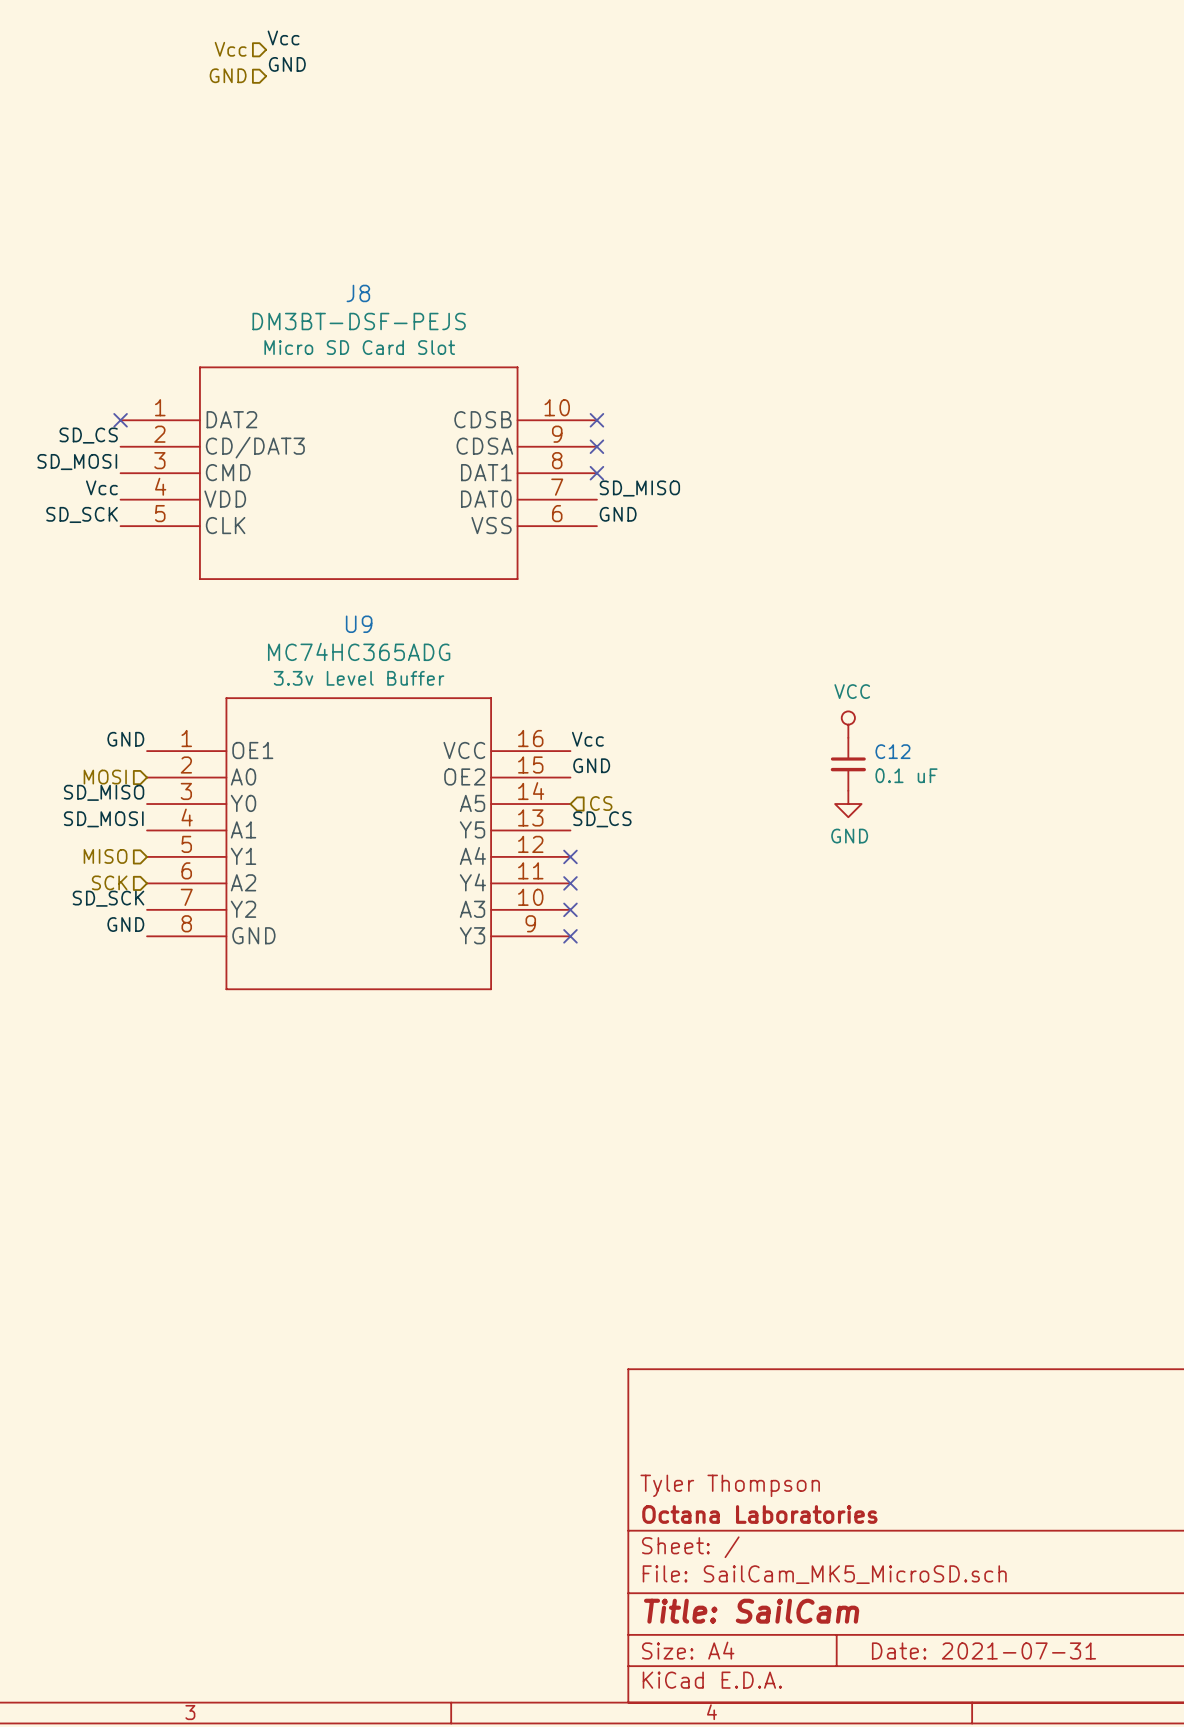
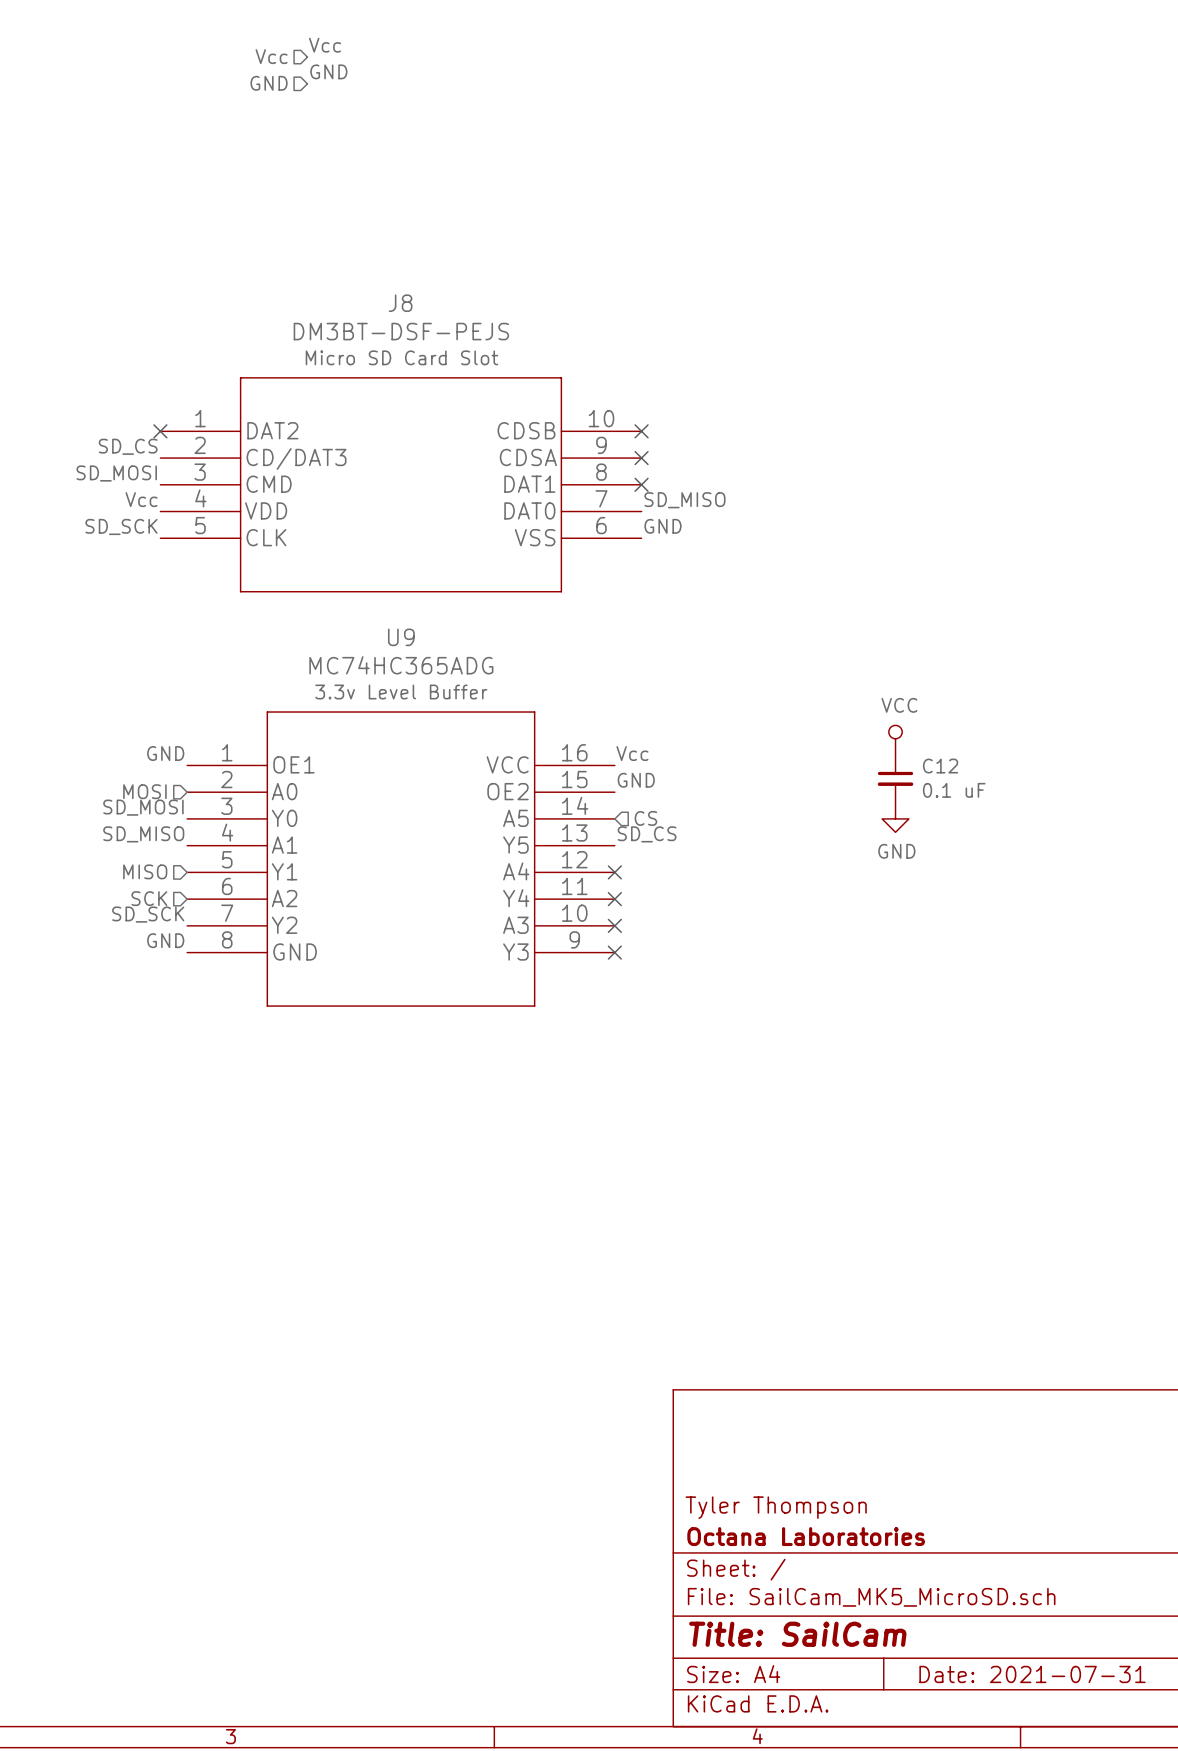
label: SD_MISO (104, 792) -> SD_MOSI (143, 807)
label: SD_MOSI (103, 819) -> SD_MISO (143, 834)

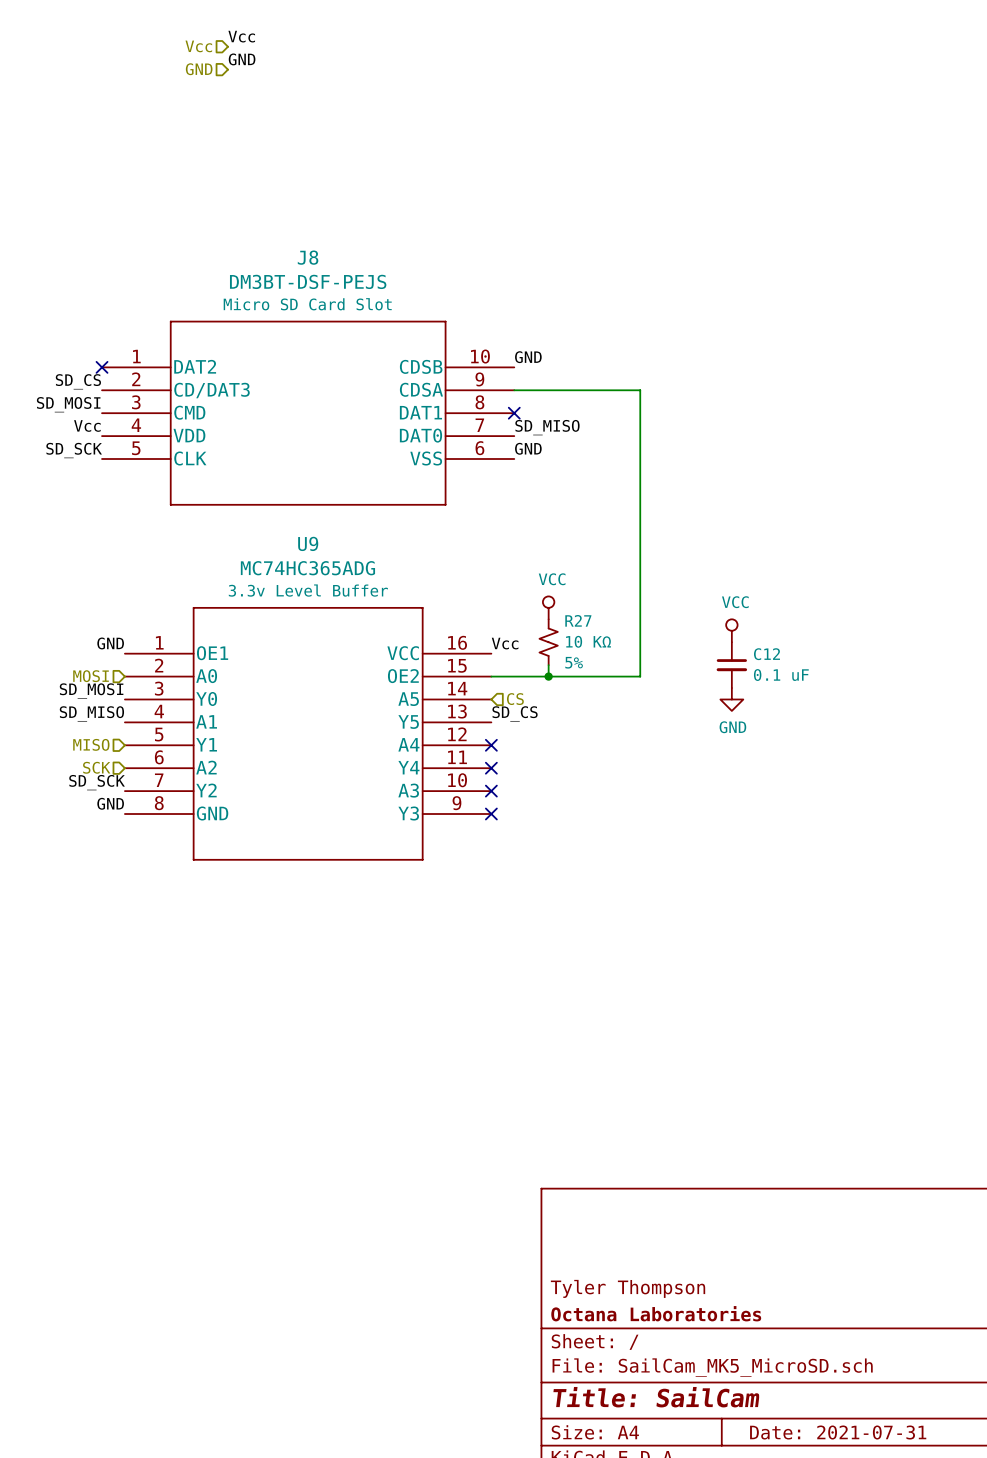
label: none -> GND (528, 357)
no-connect mark: (641, 431) -> none
wire: none -> (514, 390) (640, 390) (640, 676) (491, 676)
no-connect mark: (641, 458) -> none
power symbol: none -> VCC (548, 607)
R27: none -> 10 KΩ (548, 642)
wire: none -> (548, 665) (548, 676)
label: GND (636, 780) -> none
junction: none -> (548, 676)

